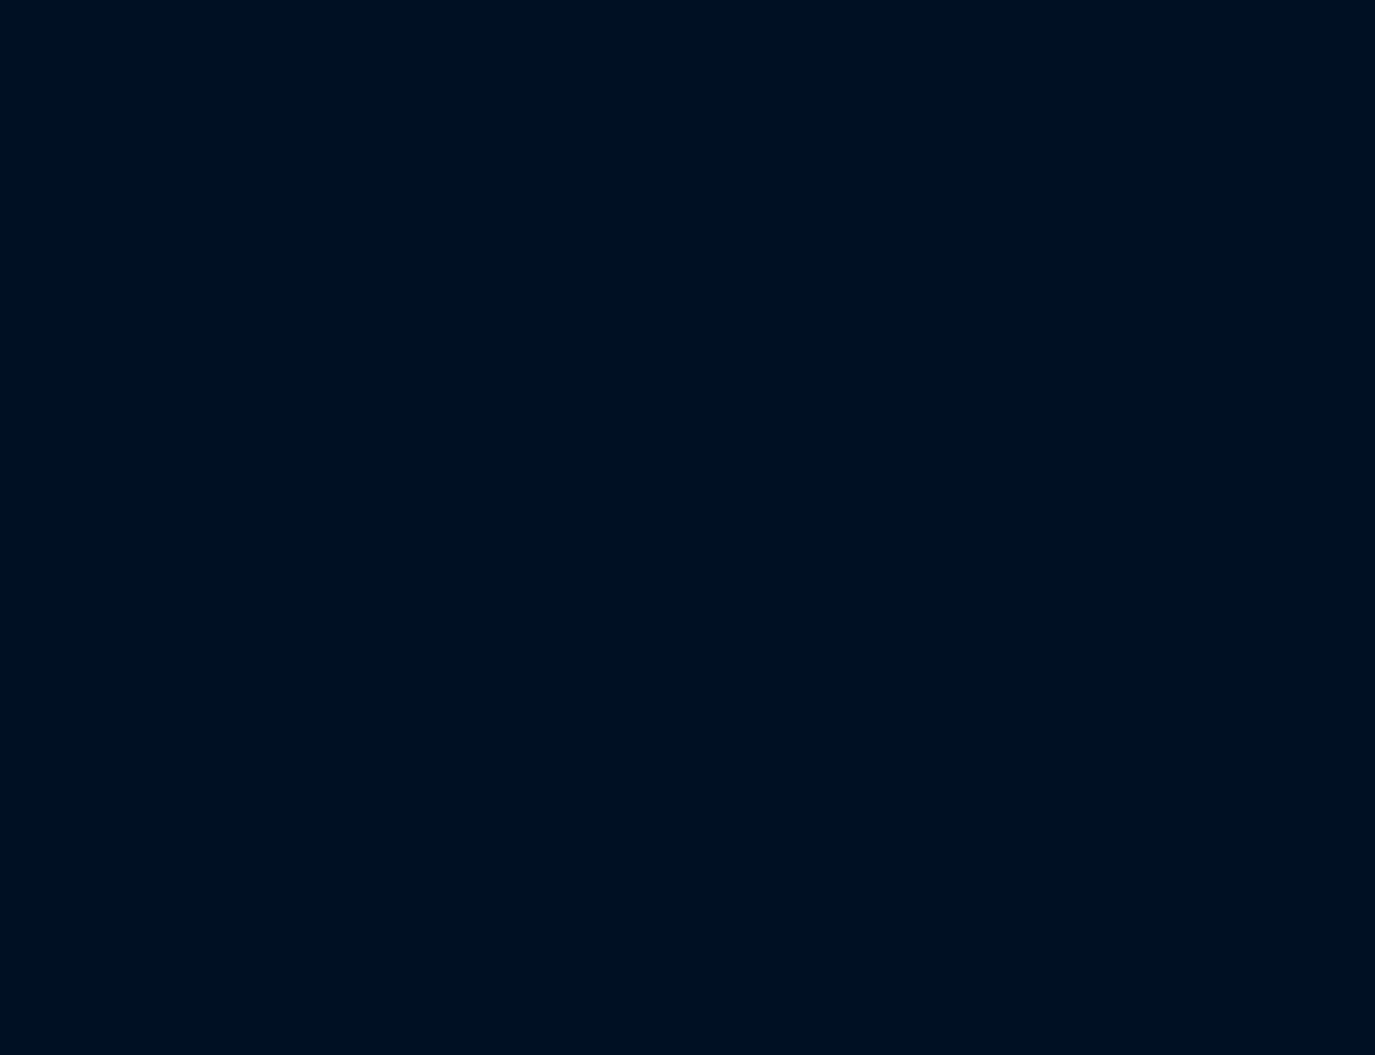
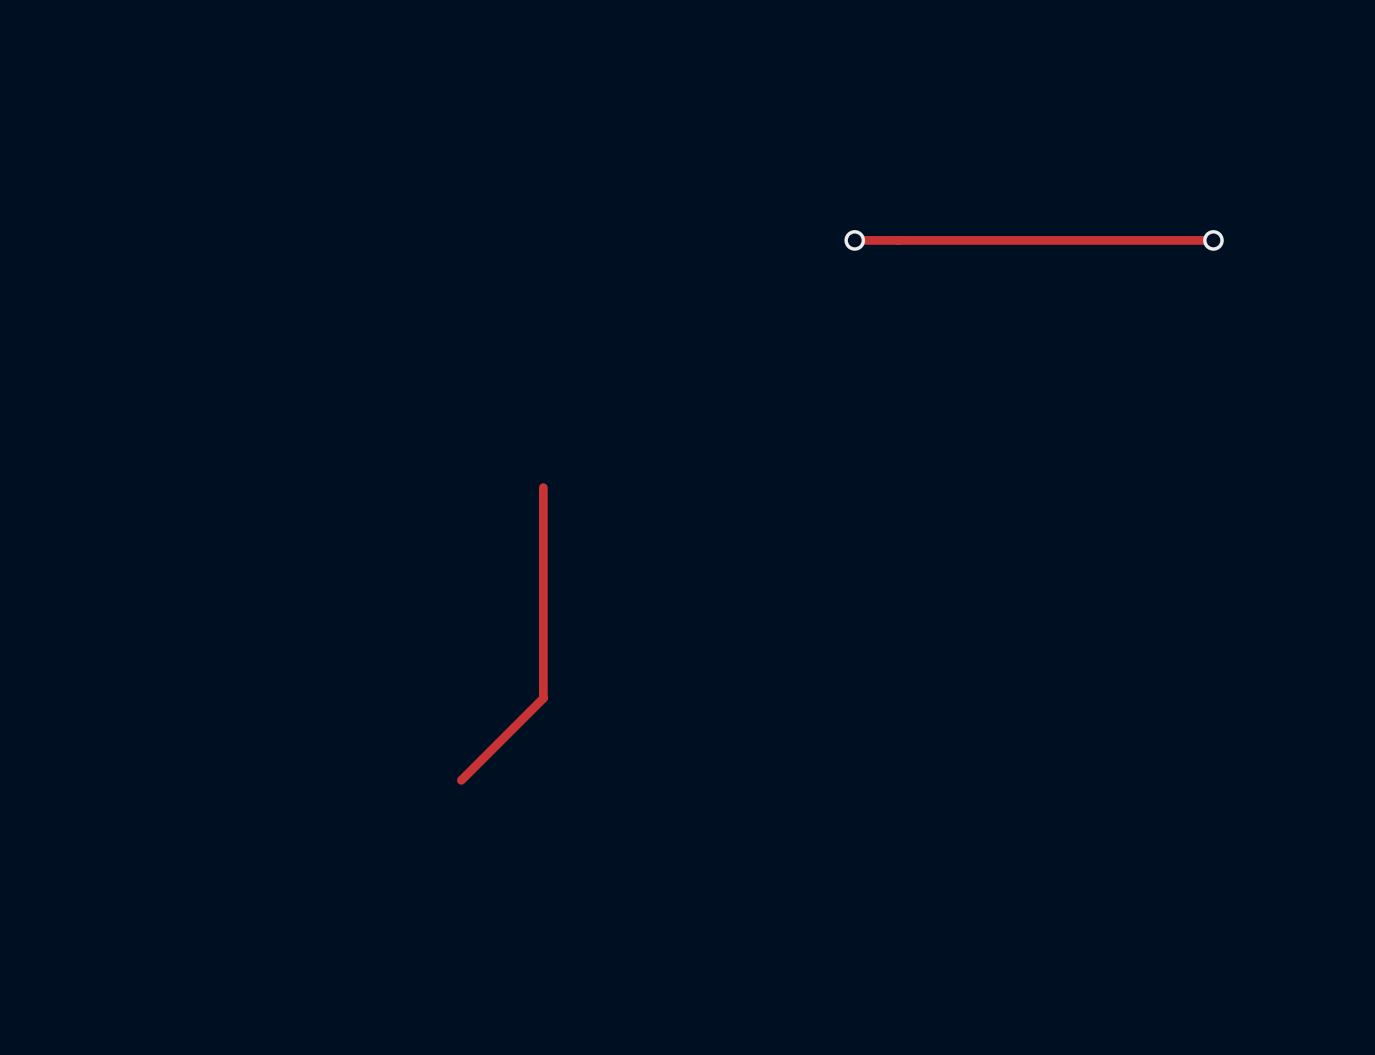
track: none -> (854, 240) (1213, 240)
via: none -> (854, 240)
via: none -> (1213, 240)
track: none -> (543, 487) (543, 698) (461, 780)

